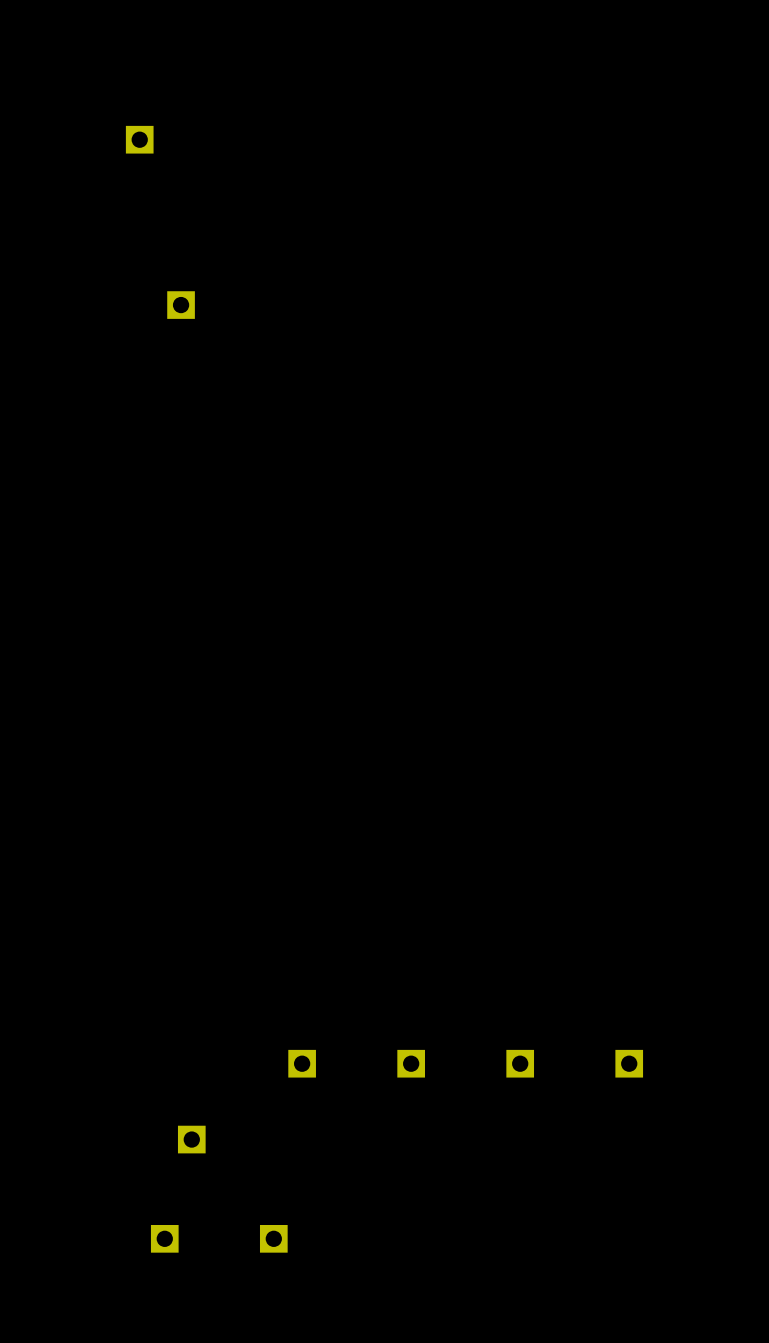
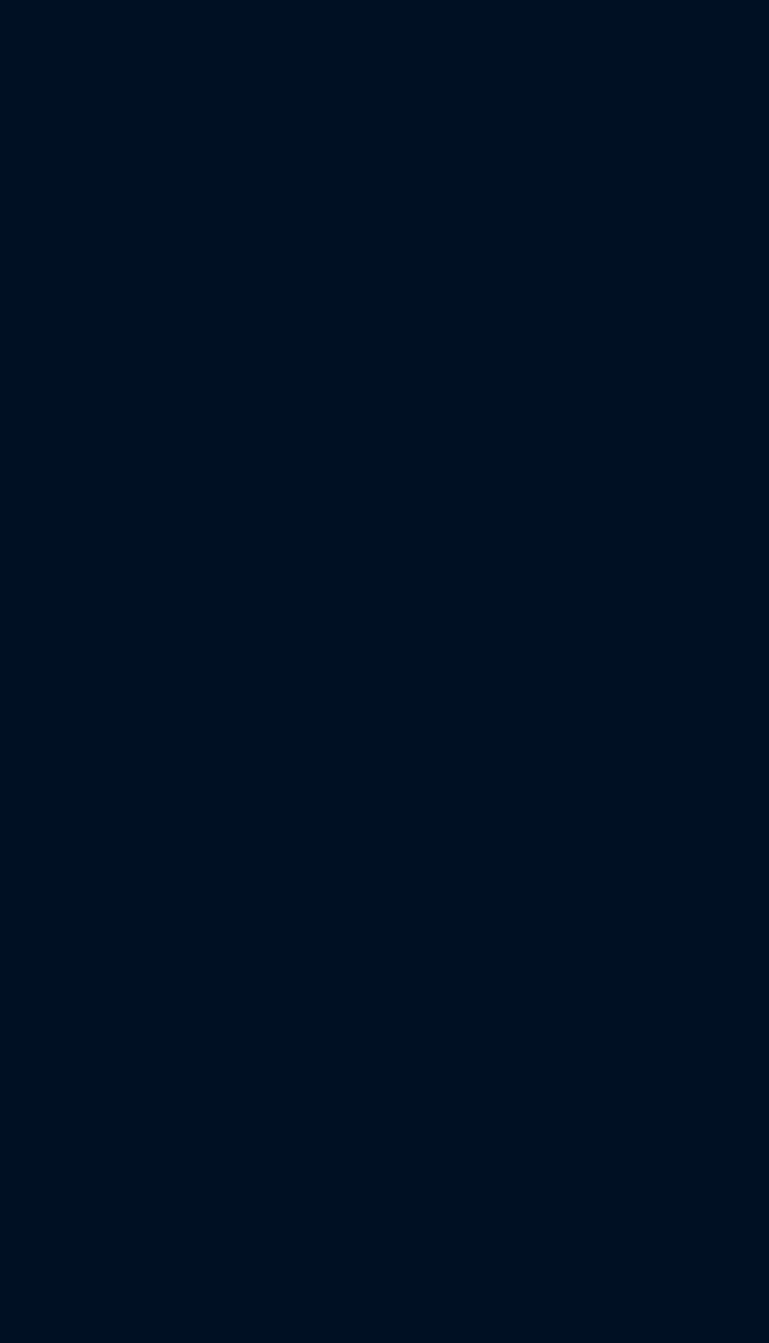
part: (139, 139) -> none
part: (181, 305) -> none
part: (302, 1063) -> none
part: (411, 1063) -> none
part: (520, 1063) -> none
part: (629, 1063) -> none
part: (191, 1139) -> none
part: (164, 1238) -> none
part: (273, 1238) -> none

